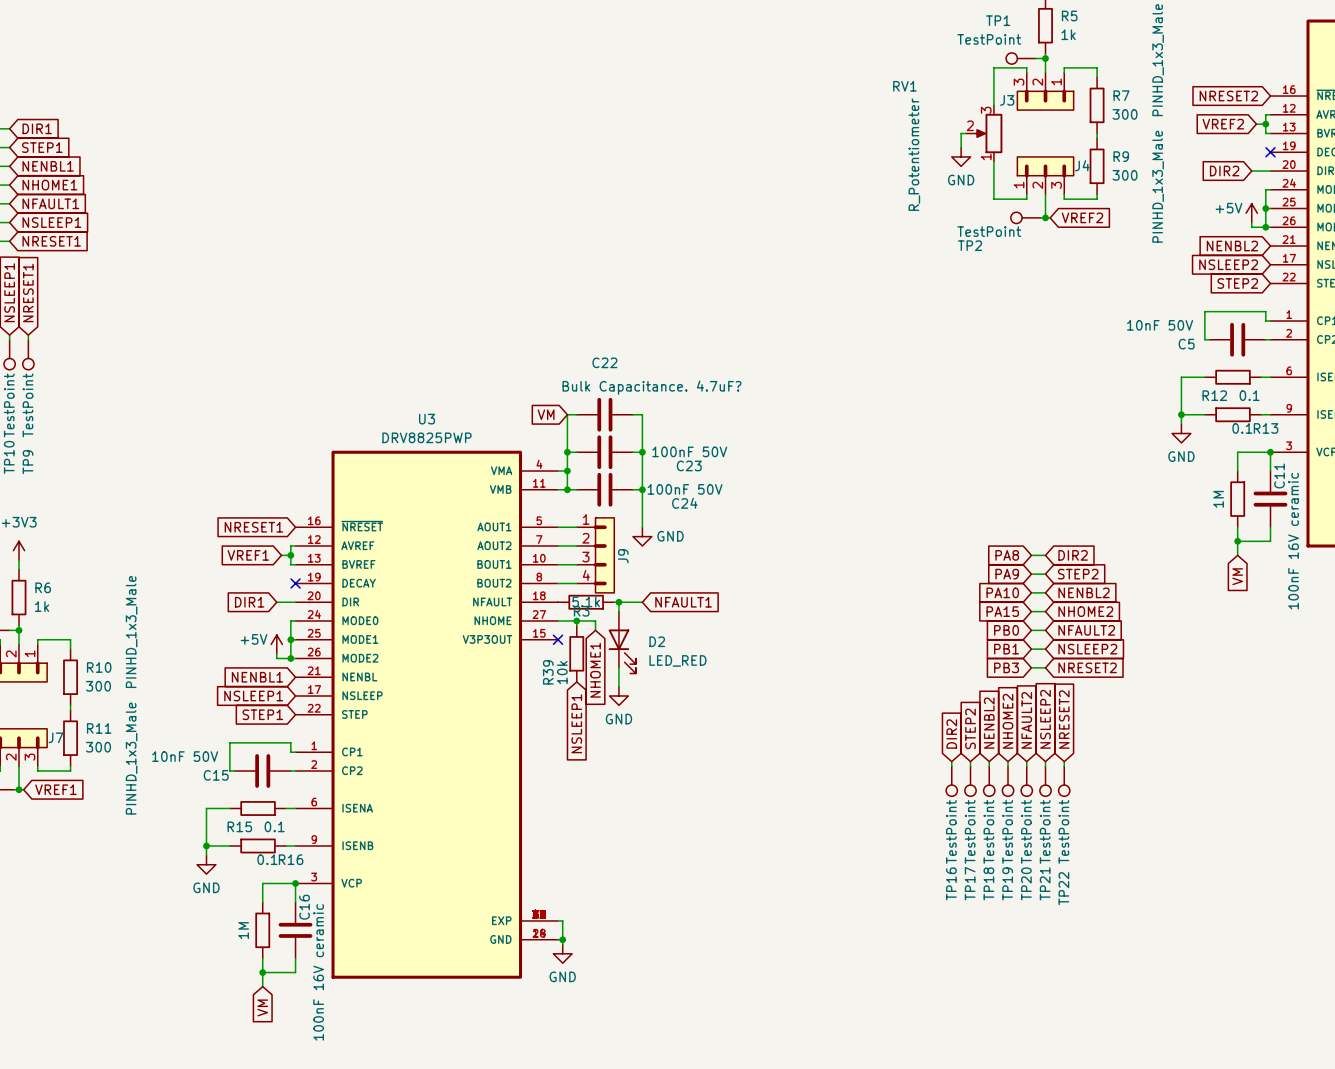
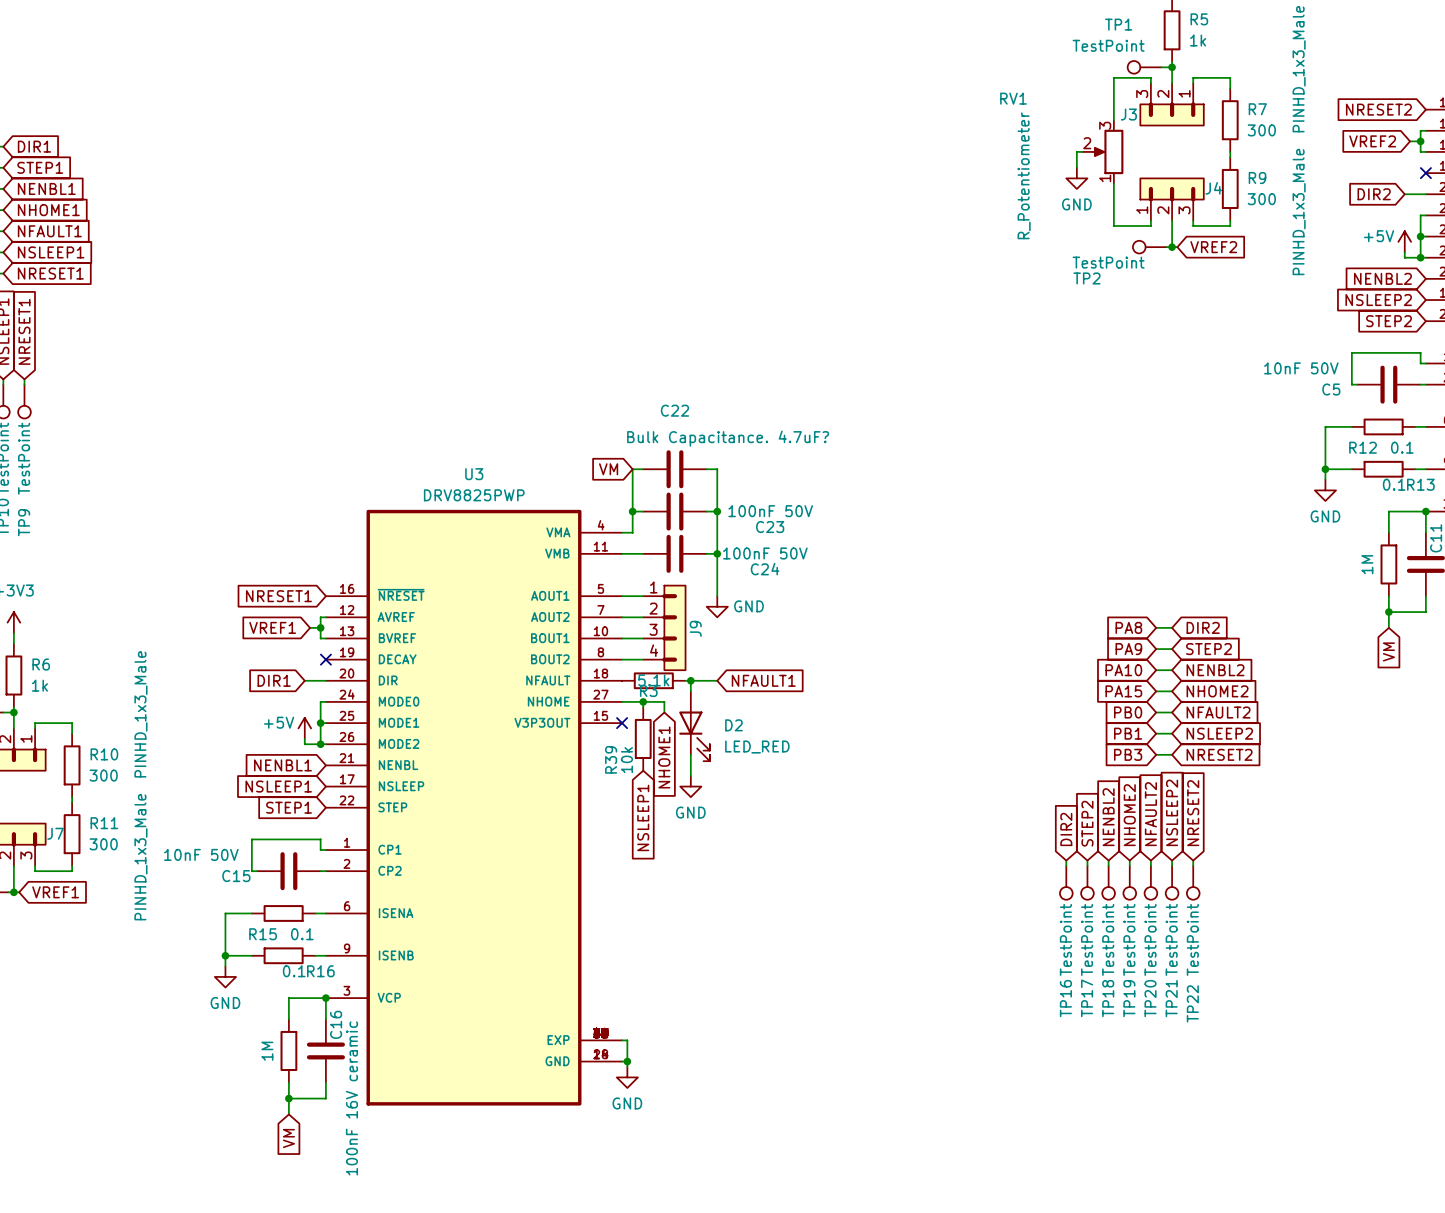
wire: (567, 471) (567, 489) -> none
junction: (567, 471) -> none
junction: (567, 489) -> none

